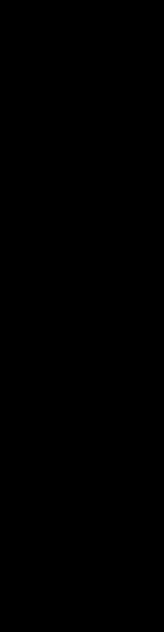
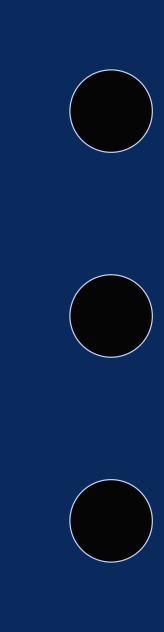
part: none -> (111, 111)
part: none -> (111, 315)
part: none -> (111, 520)

